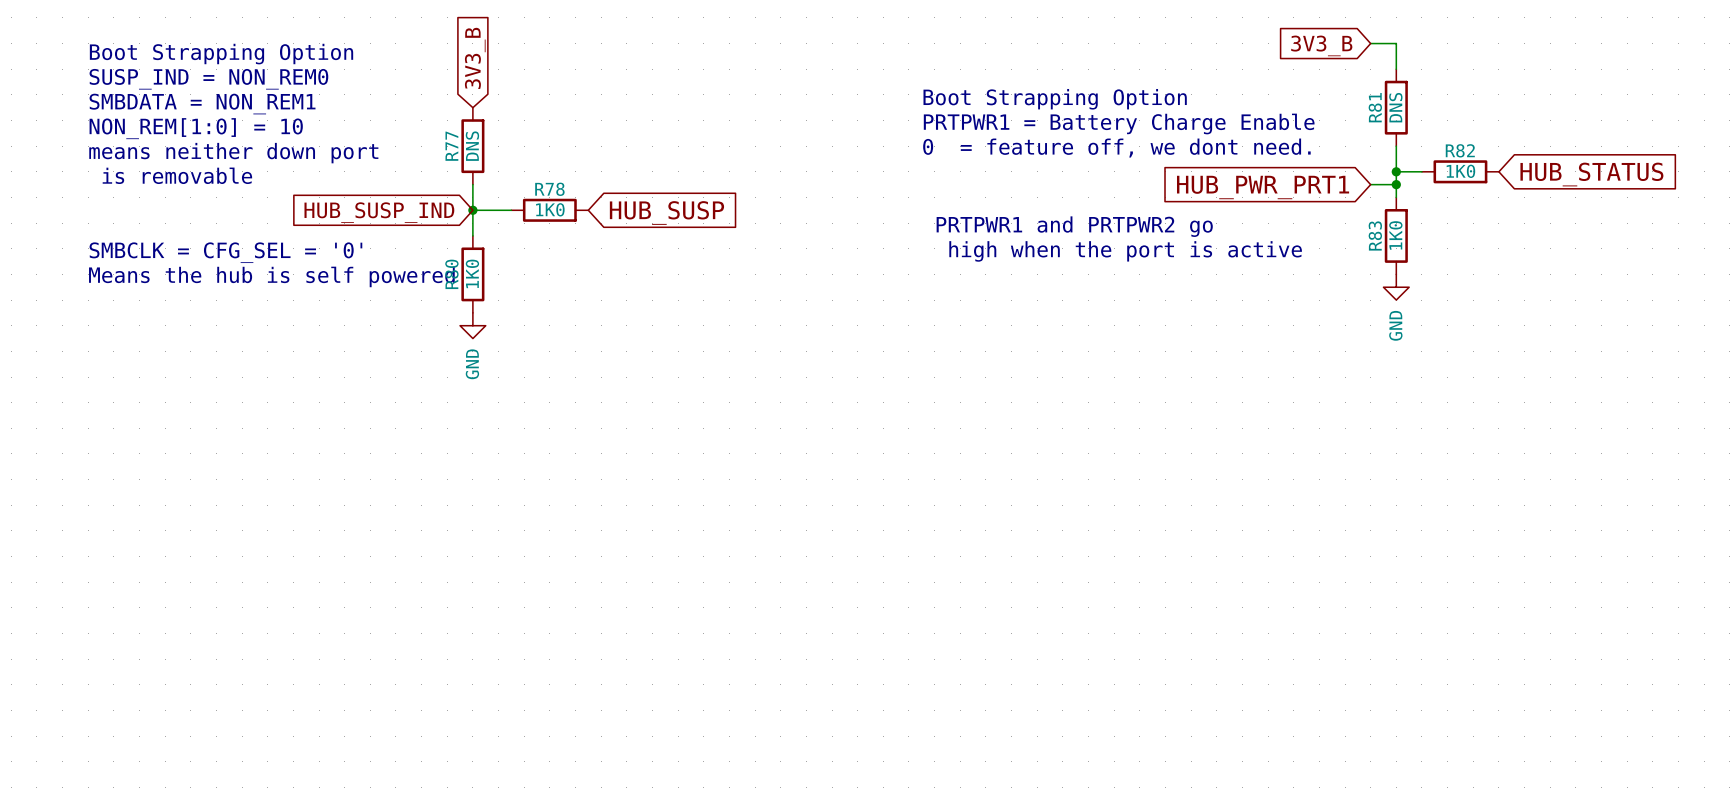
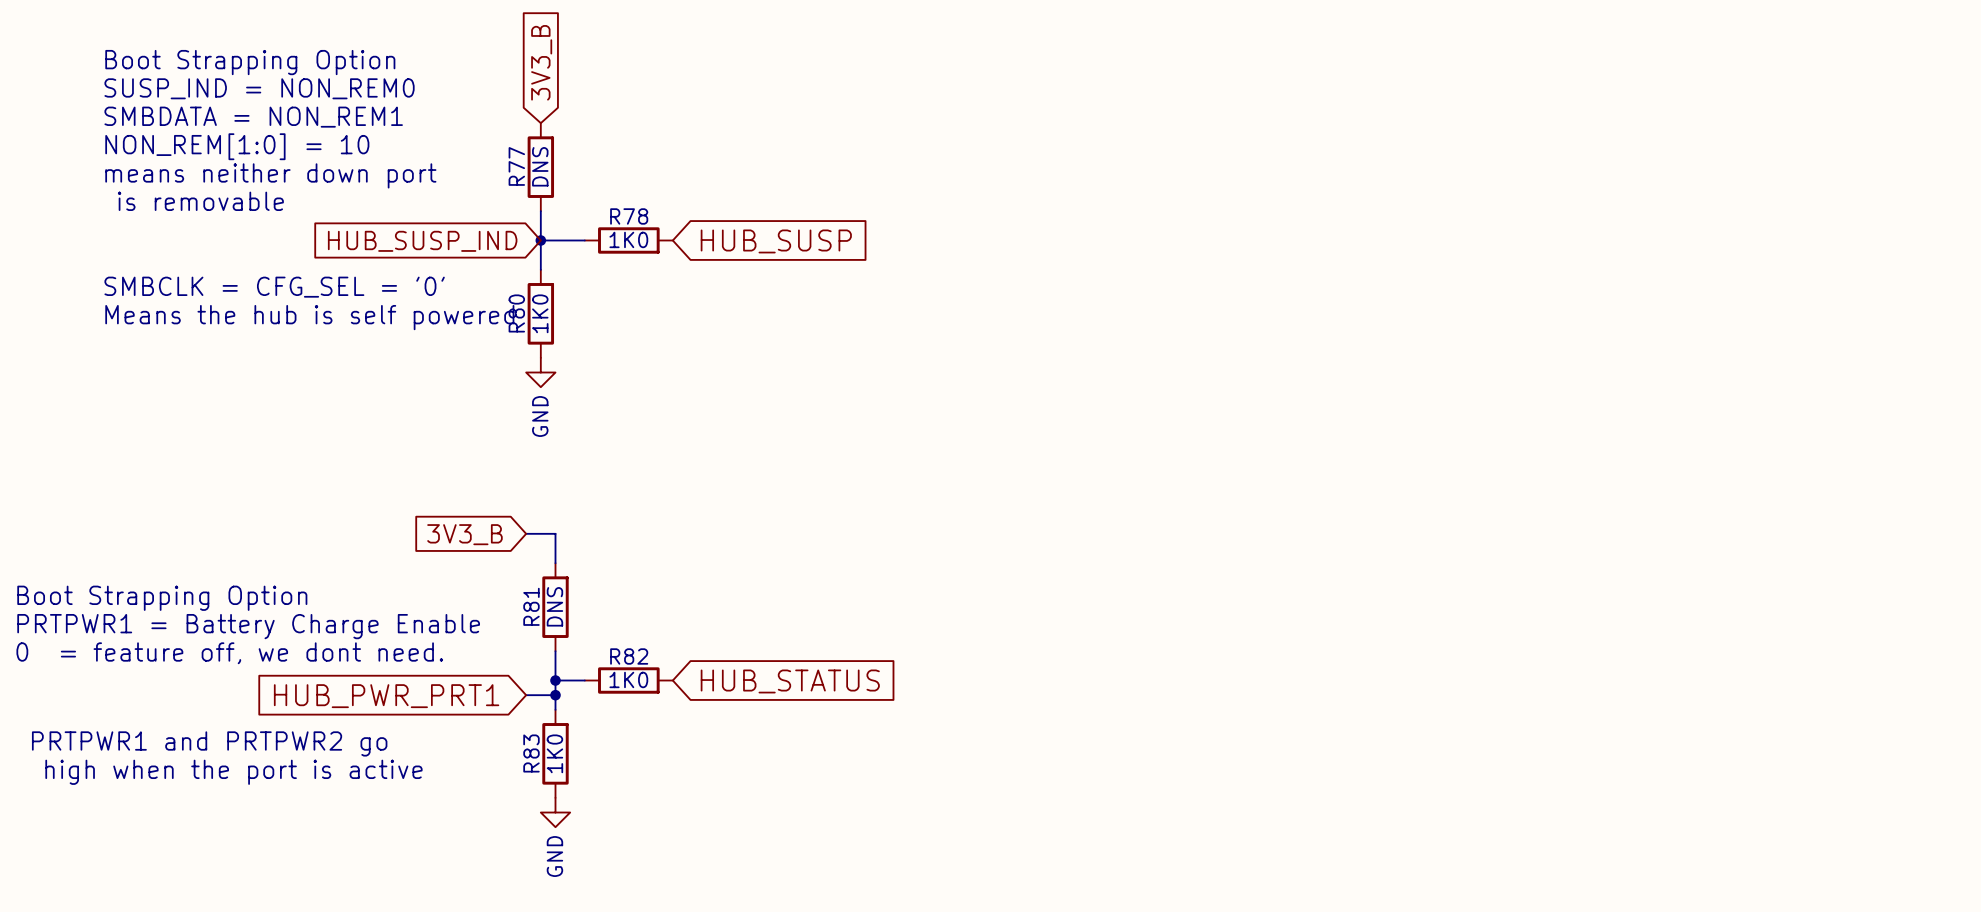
wire: (1370, 43) (1396, 43) (1396, 69) -> none
global label: 3V3_B (1321, 45) -> none
text: Boot Strapping Option (1055, 99) -> none
R81 position: (1396, 107) -> (555, 607)
text: PRTPWR1 = Battery Charge Enable (1119, 123) -> none
wire: (1396, 146) (1396, 197) -> none
text: 0 = feature off, we dont need. (1116, 148) -> none
wire: (1396, 171) (1421, 171) -> none
junction: (1396, 171) -> none
R82 position: (1460, 171) -> (628, 680)
global label: HUB_STATUS (1591, 174) -> none
wire: (1370, 184) (1396, 184) -> none
junction: (1396, 184) -> none
global label: HUB_PWR_PRT1 (1263, 187) -> none
text: PRTPWR1 and PRTPWR2 go (1074, 226) -> none
R83 position: (1396, 235) -> (555, 753)
text: high when the port is active (1125, 251) -> none
power symbol: GND (1396, 287) -> none
wire: none -> (526, 533) (555, 533) (555, 563)
global label: none -> 3V3_B (464, 534)
text: none -> Boot Strapping Option (162, 598)
text: none -> PRTPWR1 = Battery Charge Enable (248, 626)
wire: none -> (555, 651) (555, 709)
text: none -> 0 = feature off, we dont need. (229, 653)
wire: none -> (555, 680) (584, 680)
junction: none -> (555, 680)
global label: none -> HUB_STATUS (790, 681)
wire: none -> (526, 695) (555, 695)
junction: none -> (555, 695)
global label: none -> HUB_PWR_PRT1 (386, 696)
text: none -> PRTPWR1 and PRTPWR2 go (209, 743)
text: none -> high when the port is active (233, 772)
power symbol: none -> GND (555, 812)

